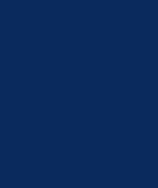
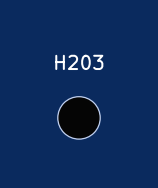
H203: none -> (79, 117)

